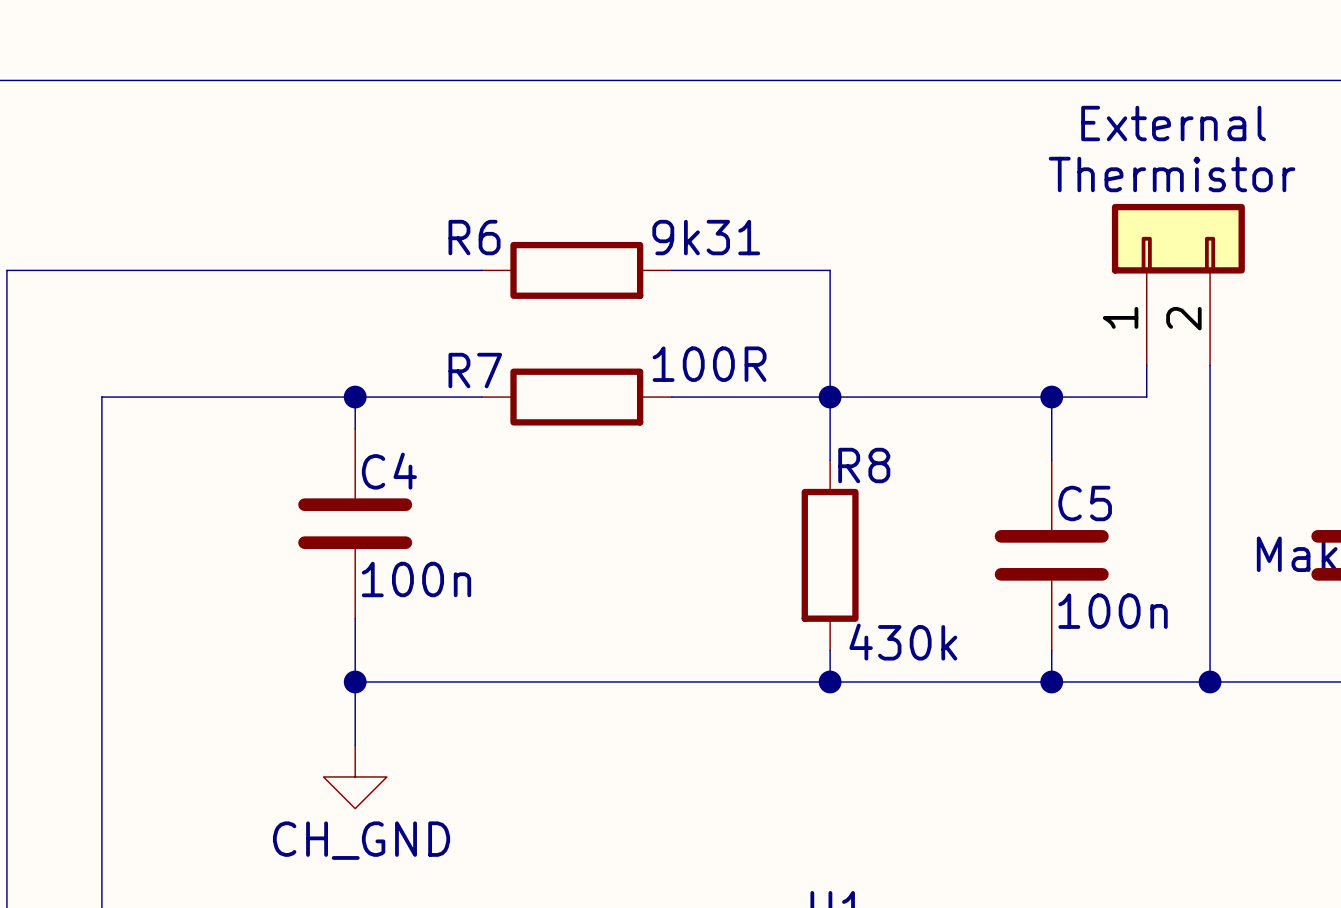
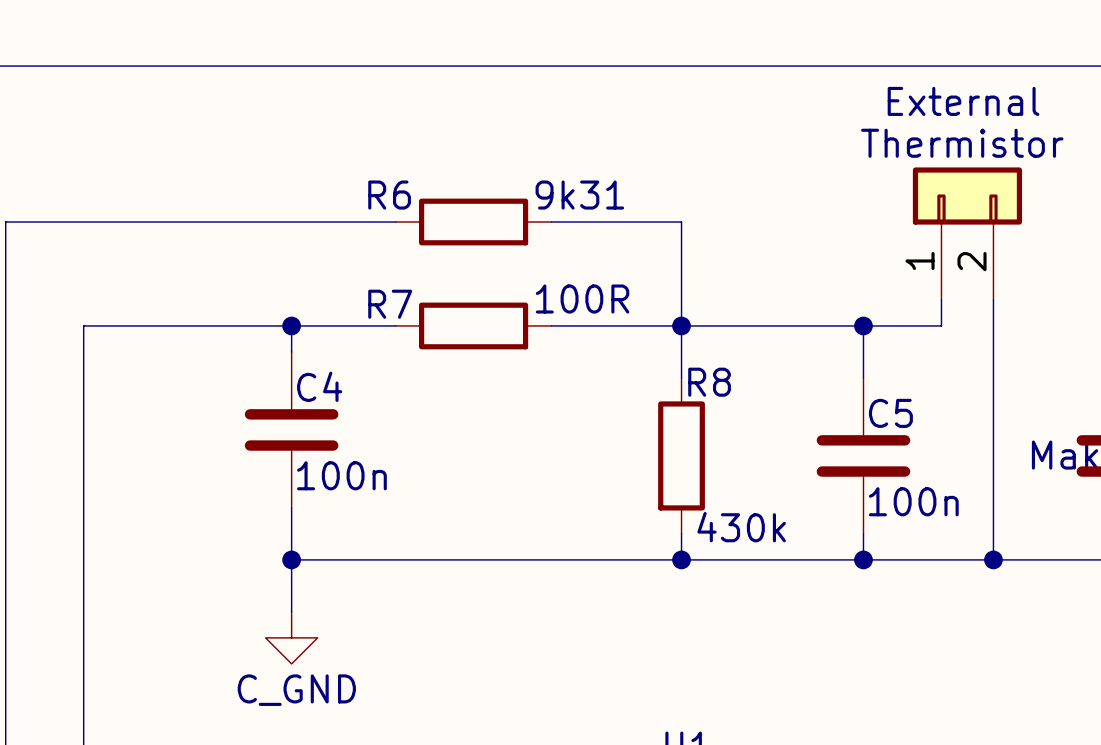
power symbol: CH_GND (355, 776) -> C_GND (291, 637)

